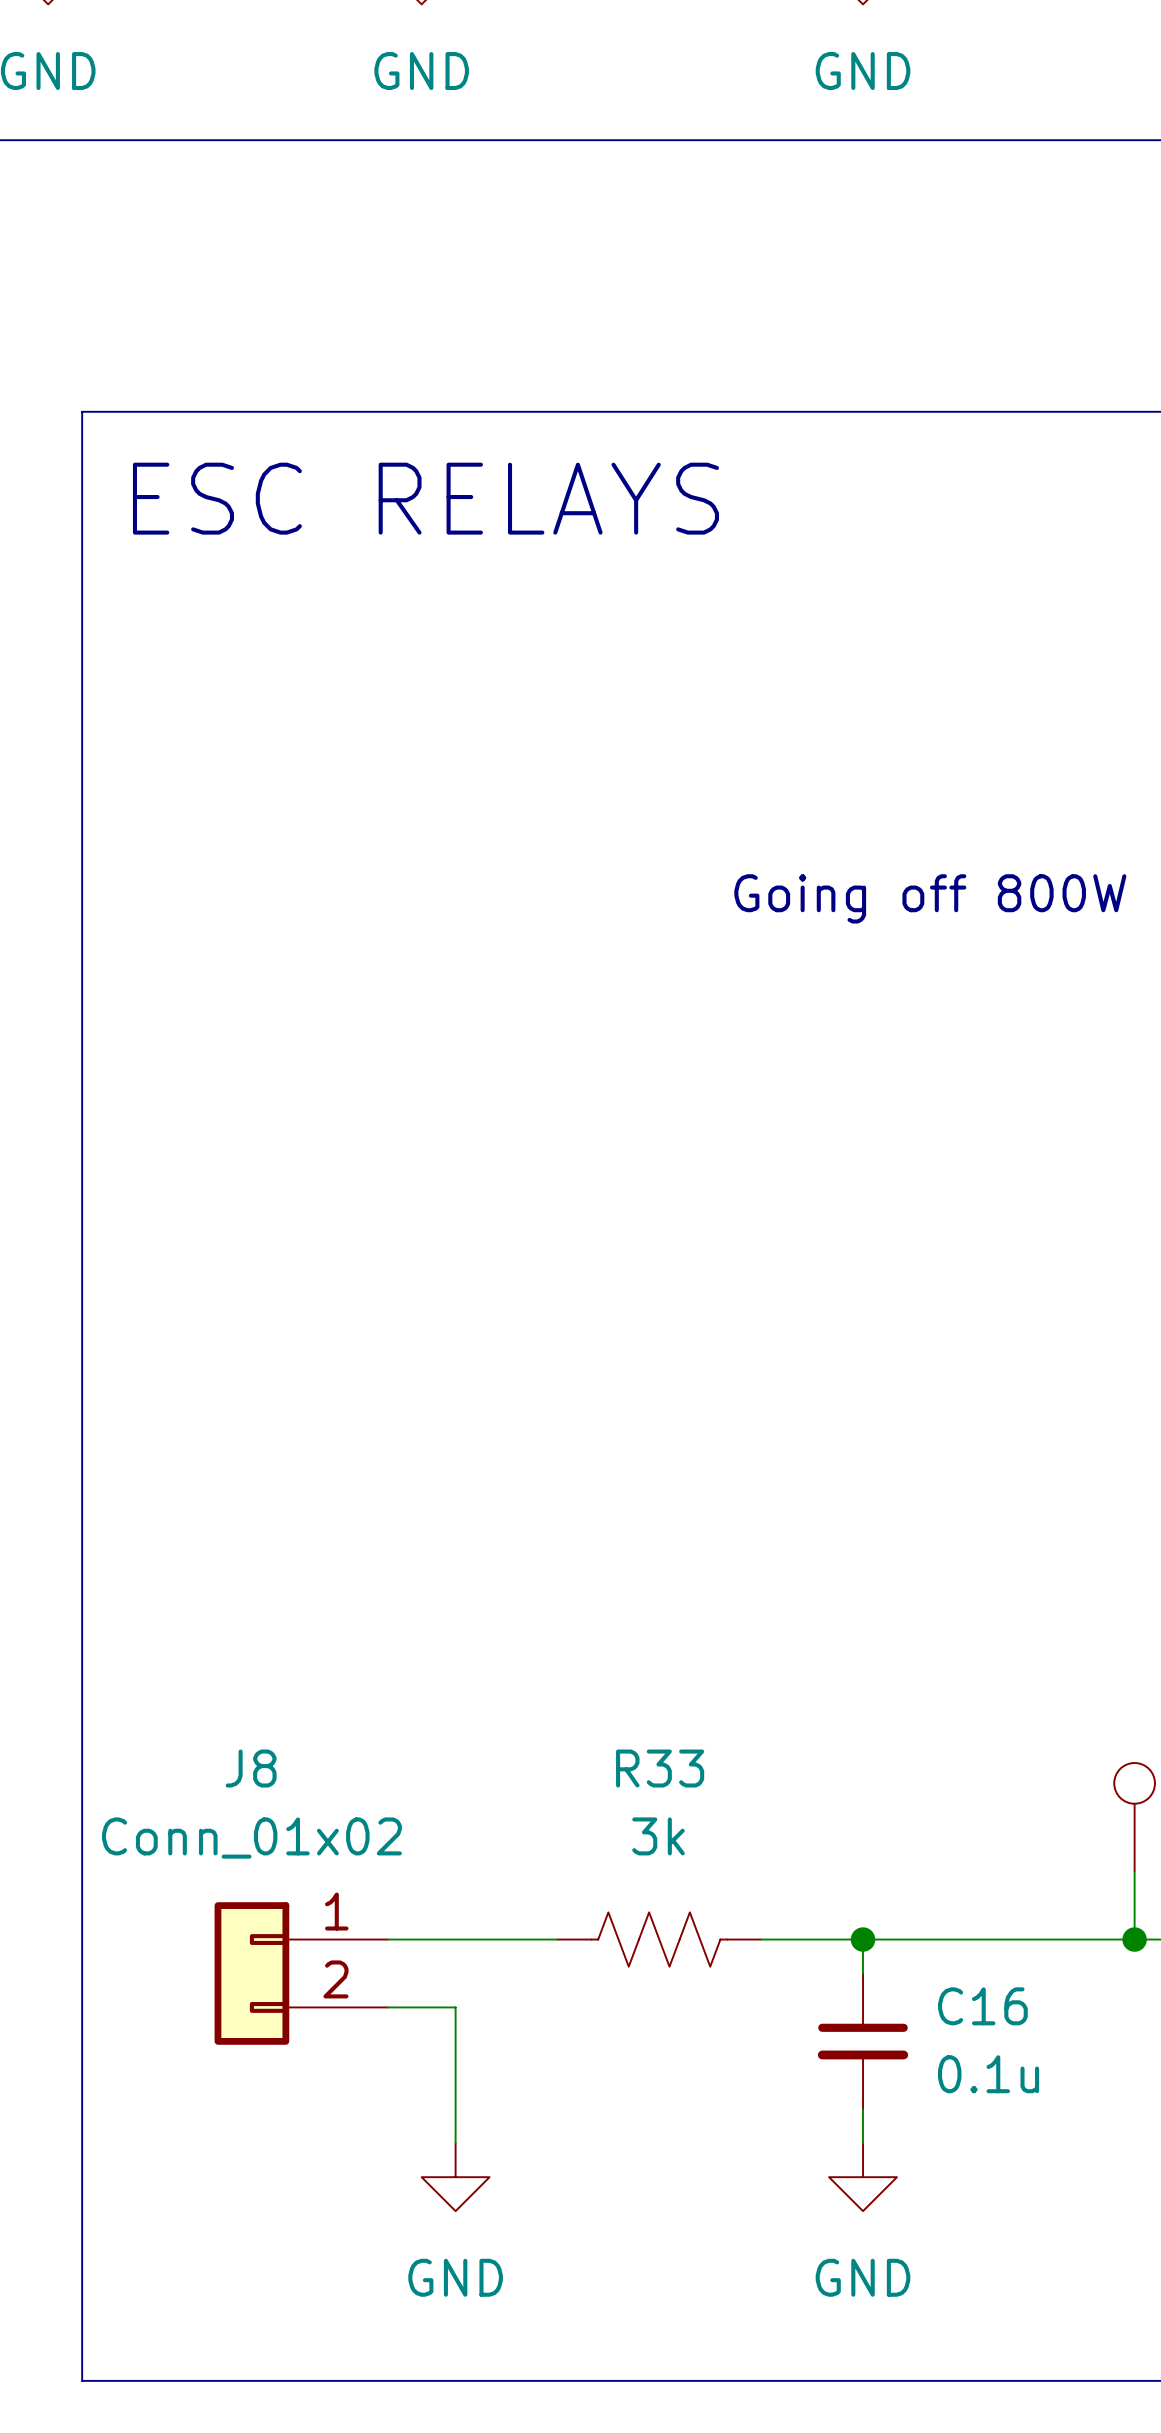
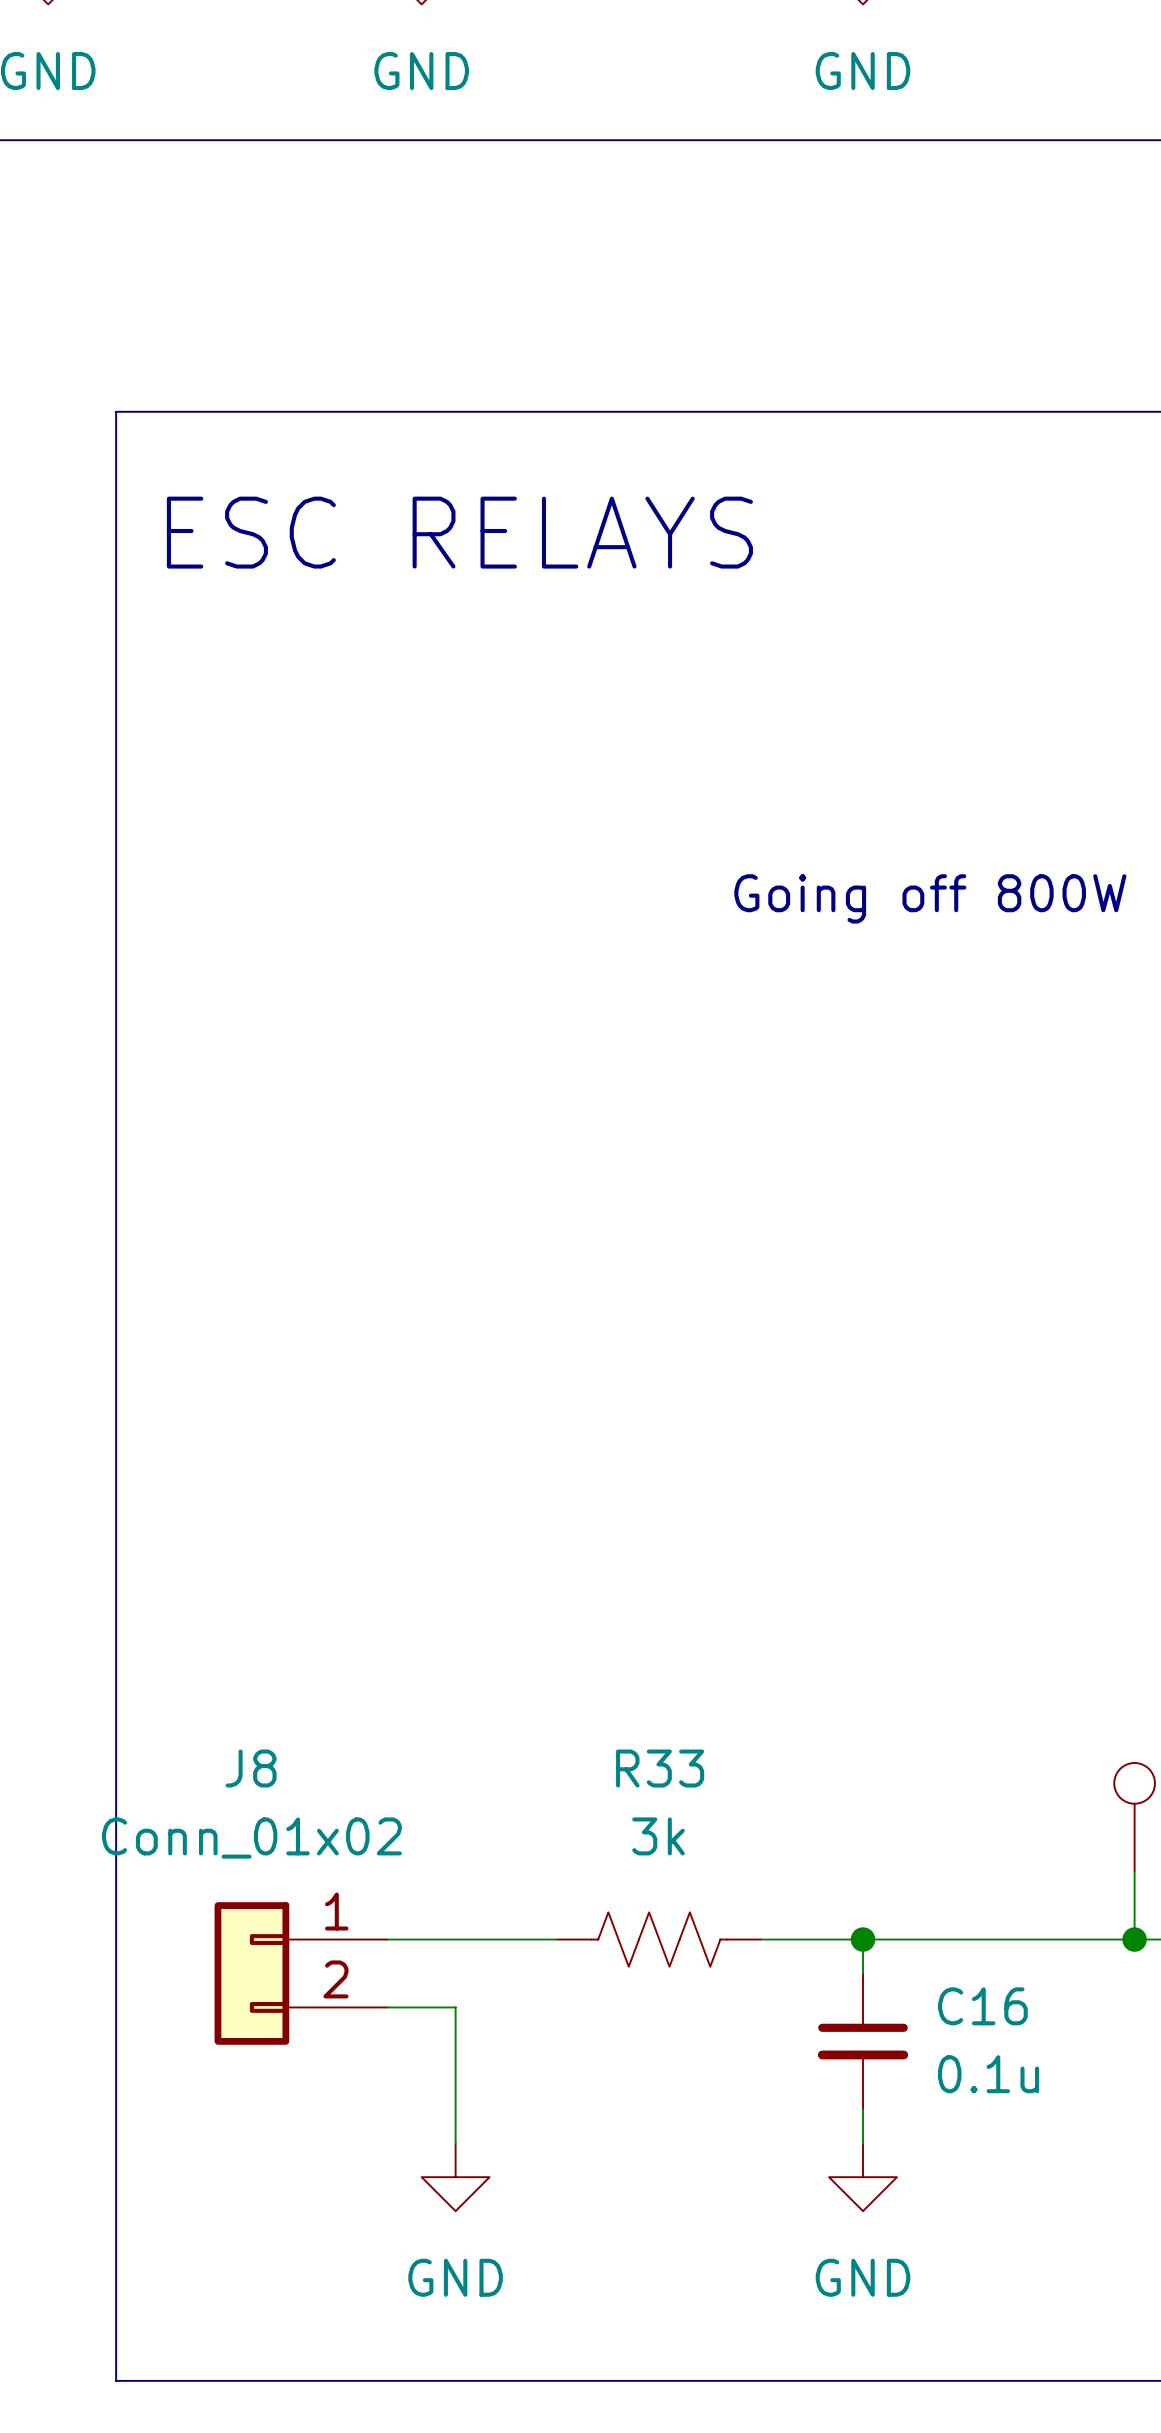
line: (116, 411) (82, 411) (82, 2380) (116, 2380) -> (116, 411) (116, 2380)
text position: ESC RELAYS (425, 498) -> ESC RELAYS (459, 532)

